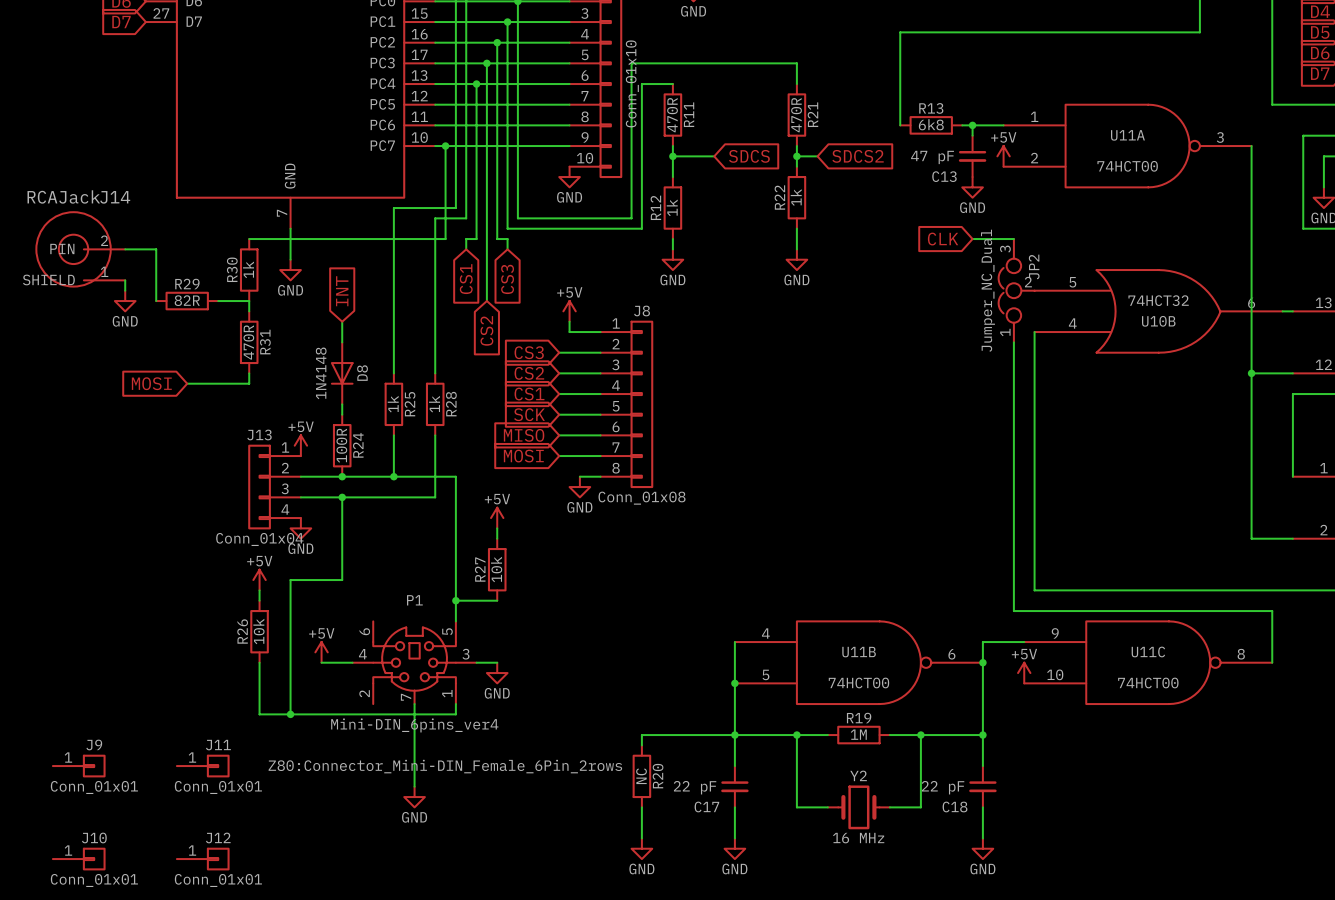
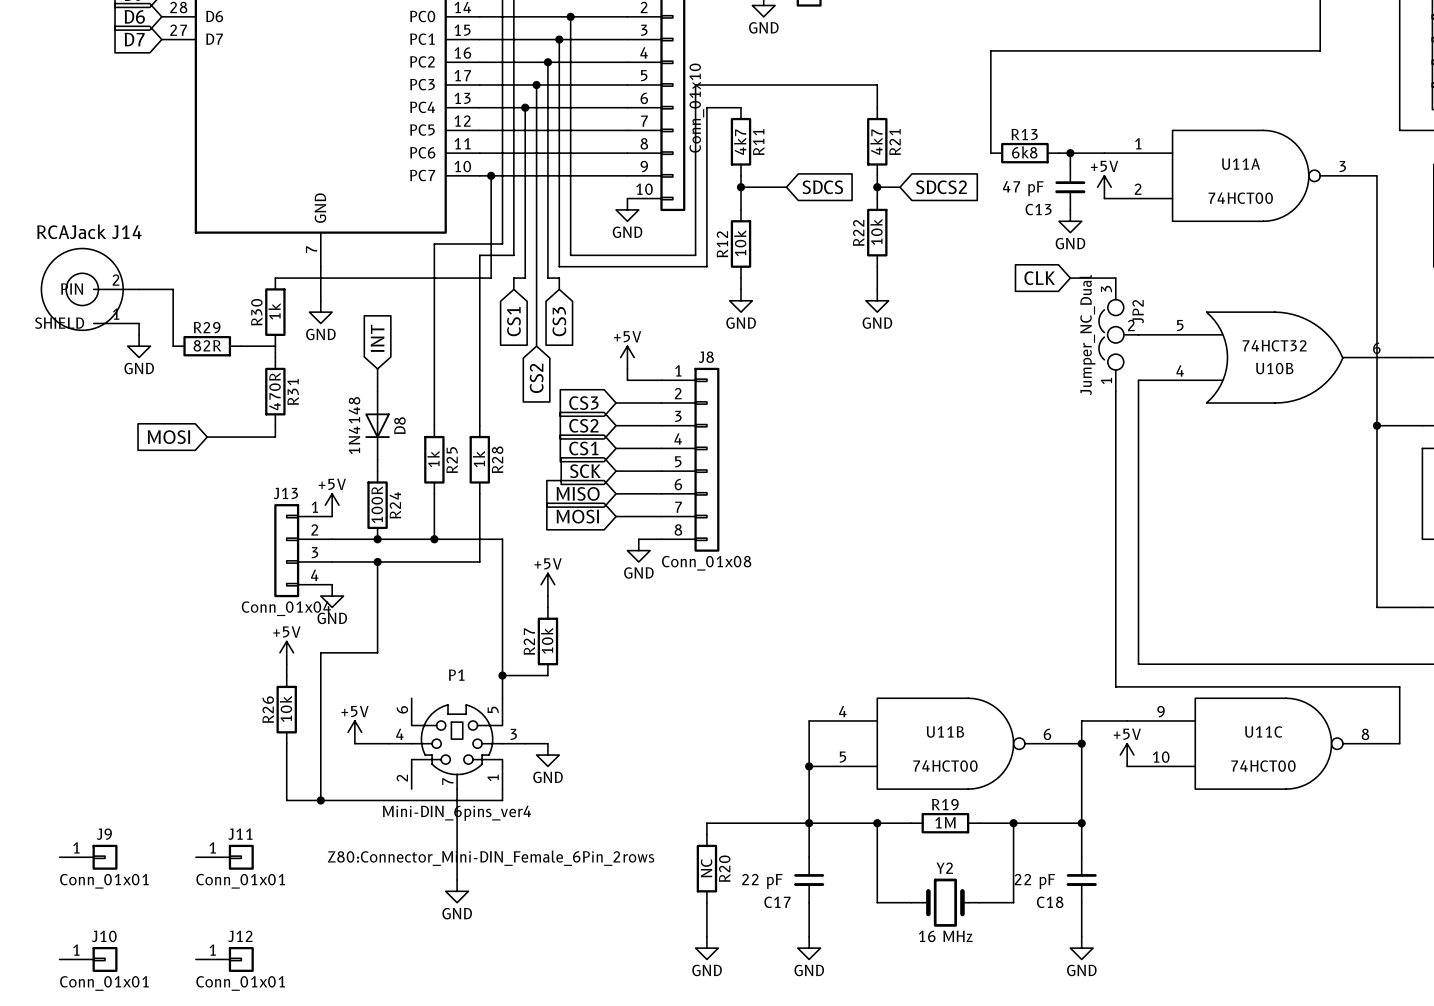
R11 value: 470R (672, 115) -> 4k7 (740, 142)
R21 value: 470R (796, 115) -> 4k7 (876, 142)
R22 value: 1k (796, 197) -> 10k (876, 231)
R12 value: 1k (672, 207) -> 10k (740, 243)

